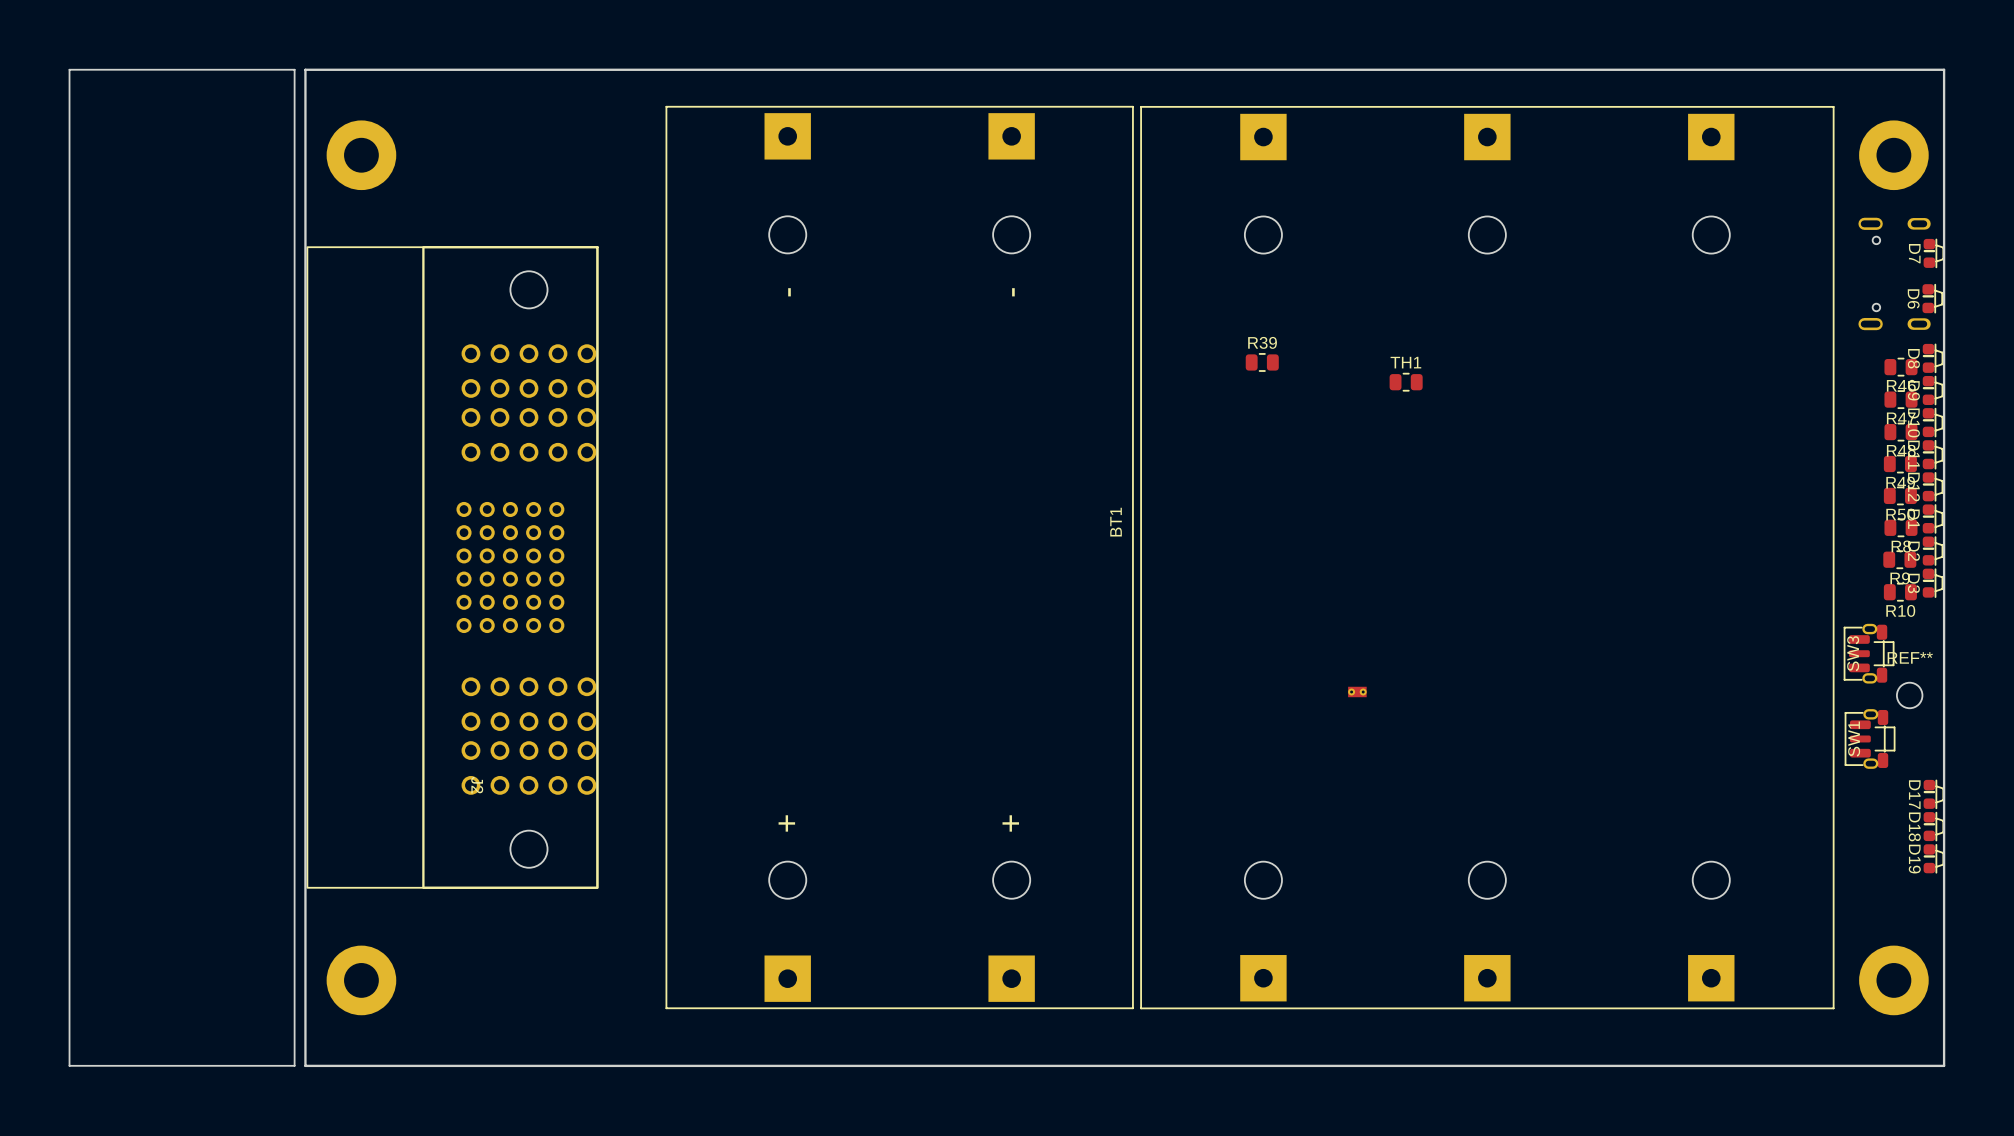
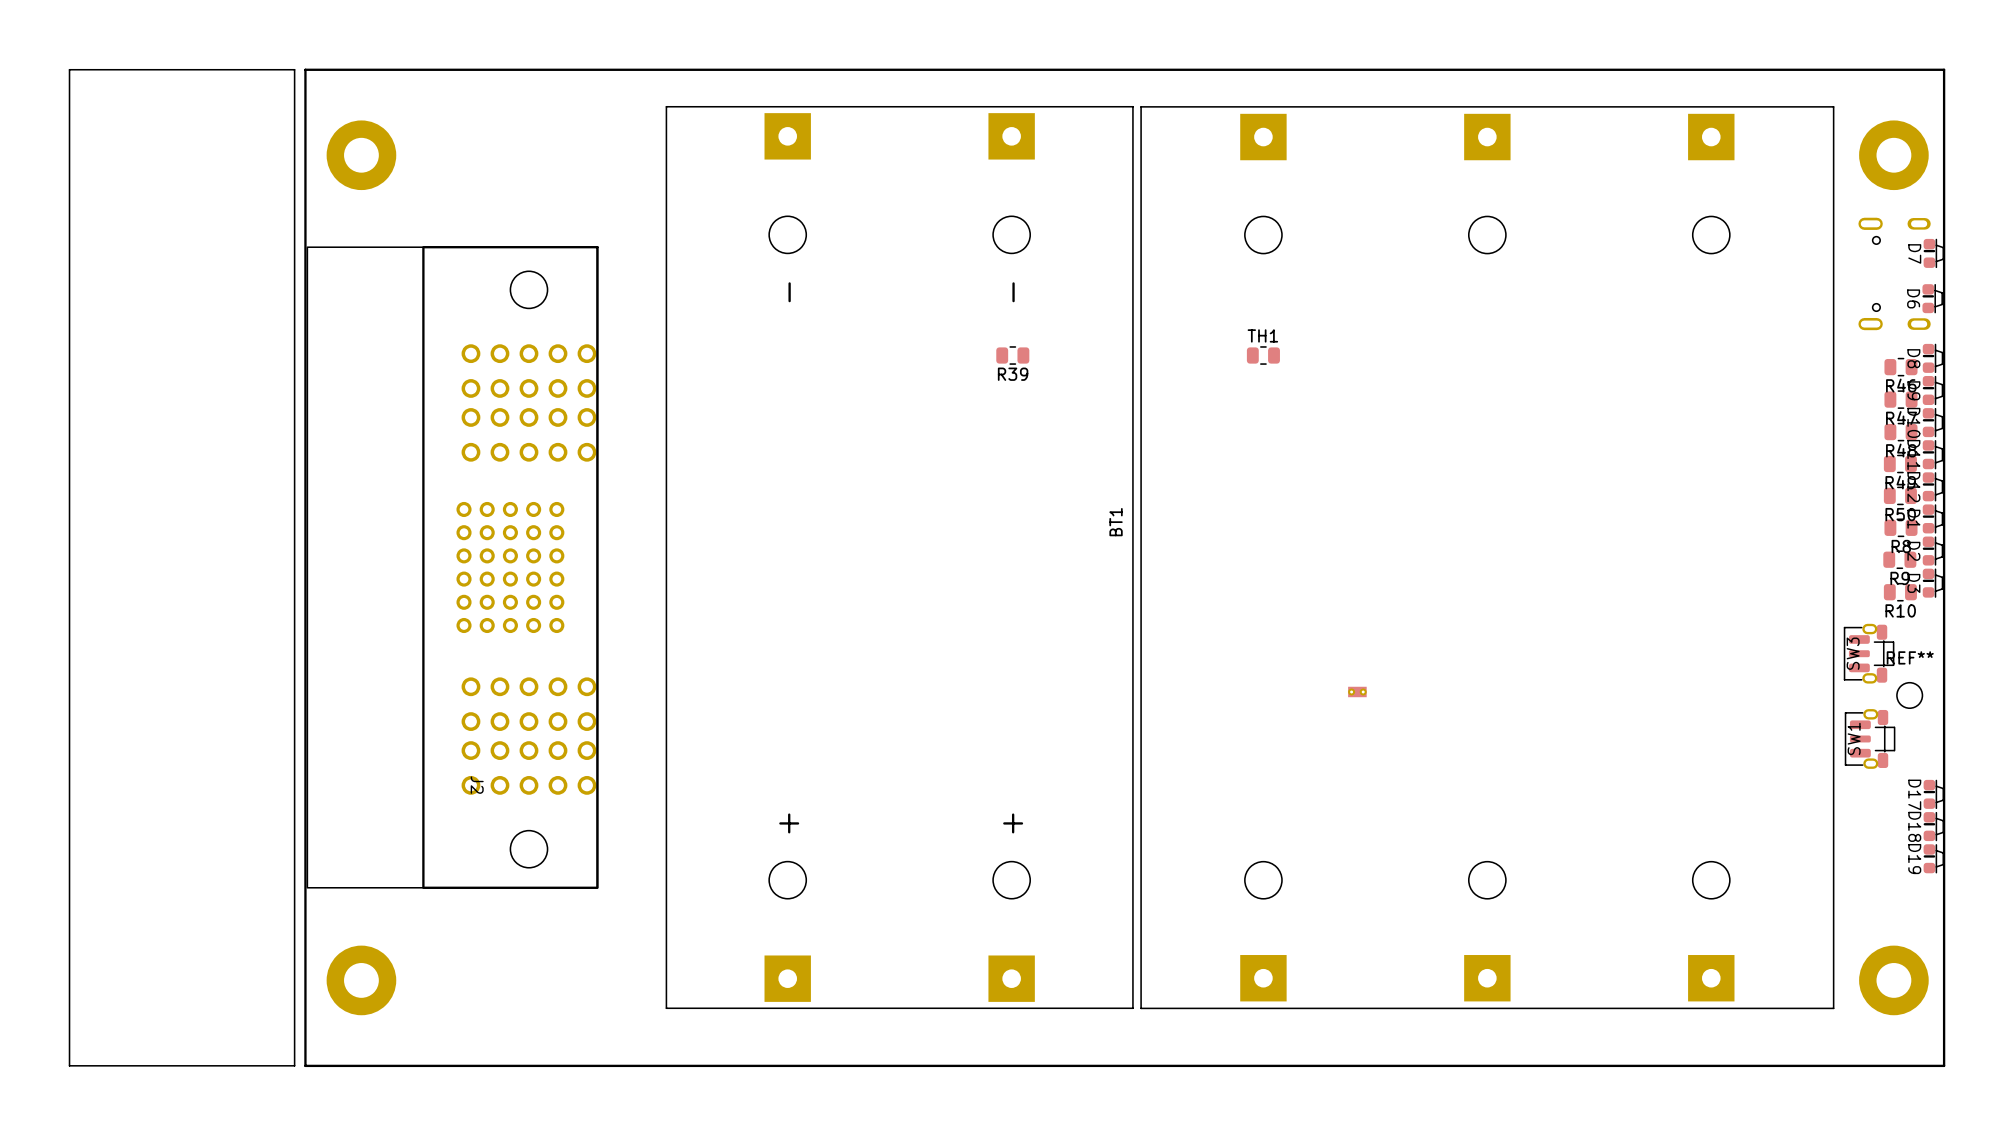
R39 name position: R39 (1262, 342) -> R39 (1013, 374)
R39 position: (1262, 362) -> (1012, 355)
TH1 position: (1406, 382) -> (1263, 355)

